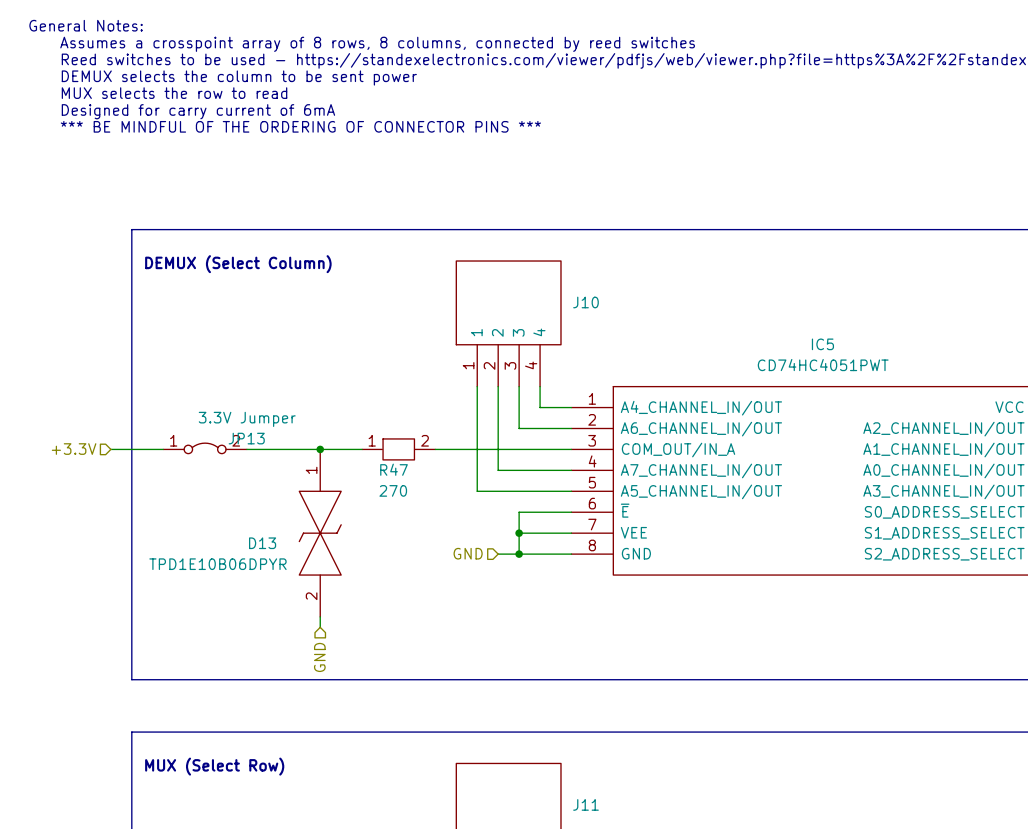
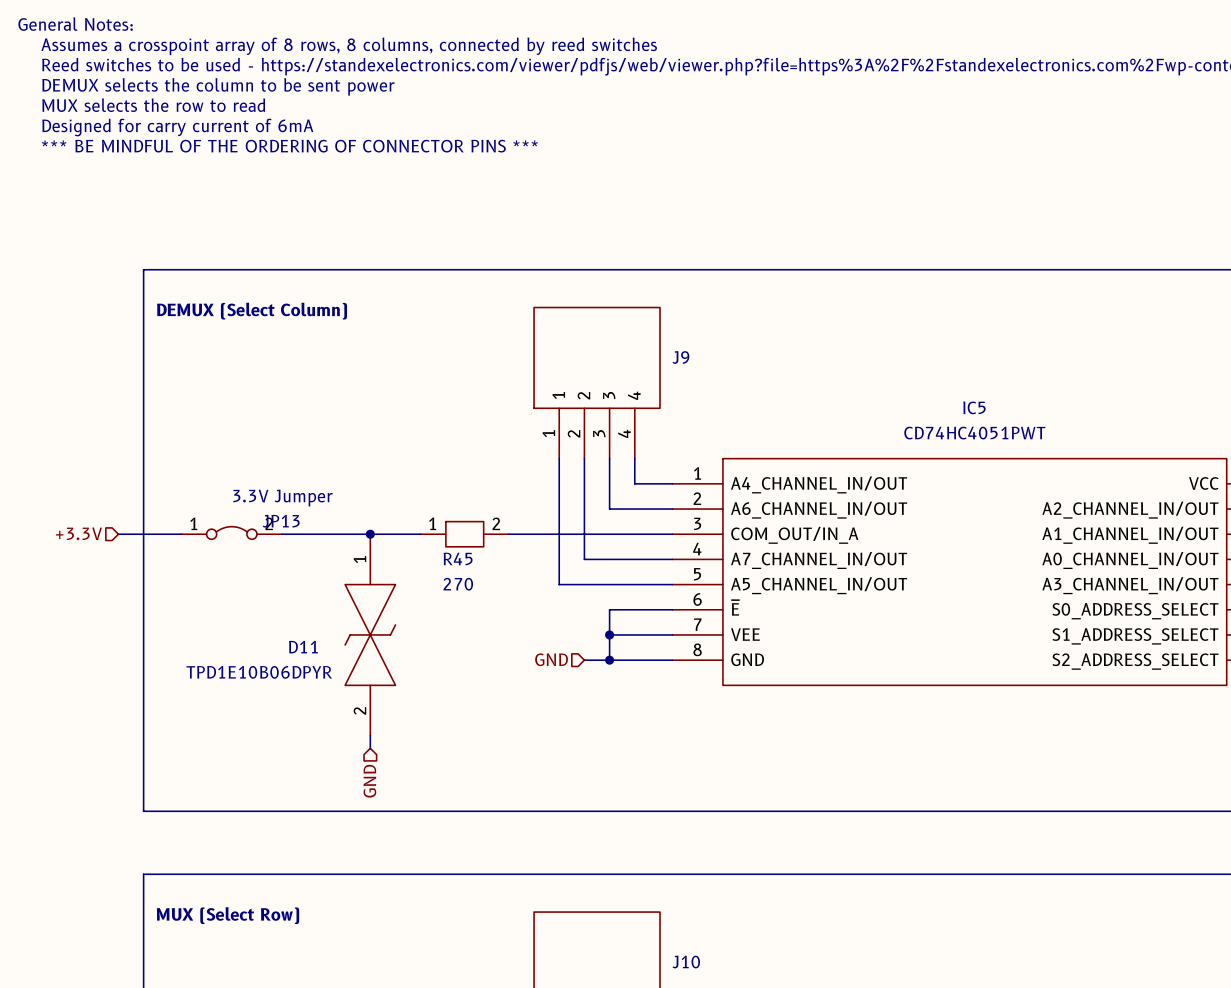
J10 name: J10 (585, 302) -> J9 (680, 357)
R47 name: R47 (394, 469) -> R45 (458, 558)
D13 name: D13 (262, 543) -> D11 (303, 647)
J11 name: J11 (585, 804) -> J10 (686, 962)

